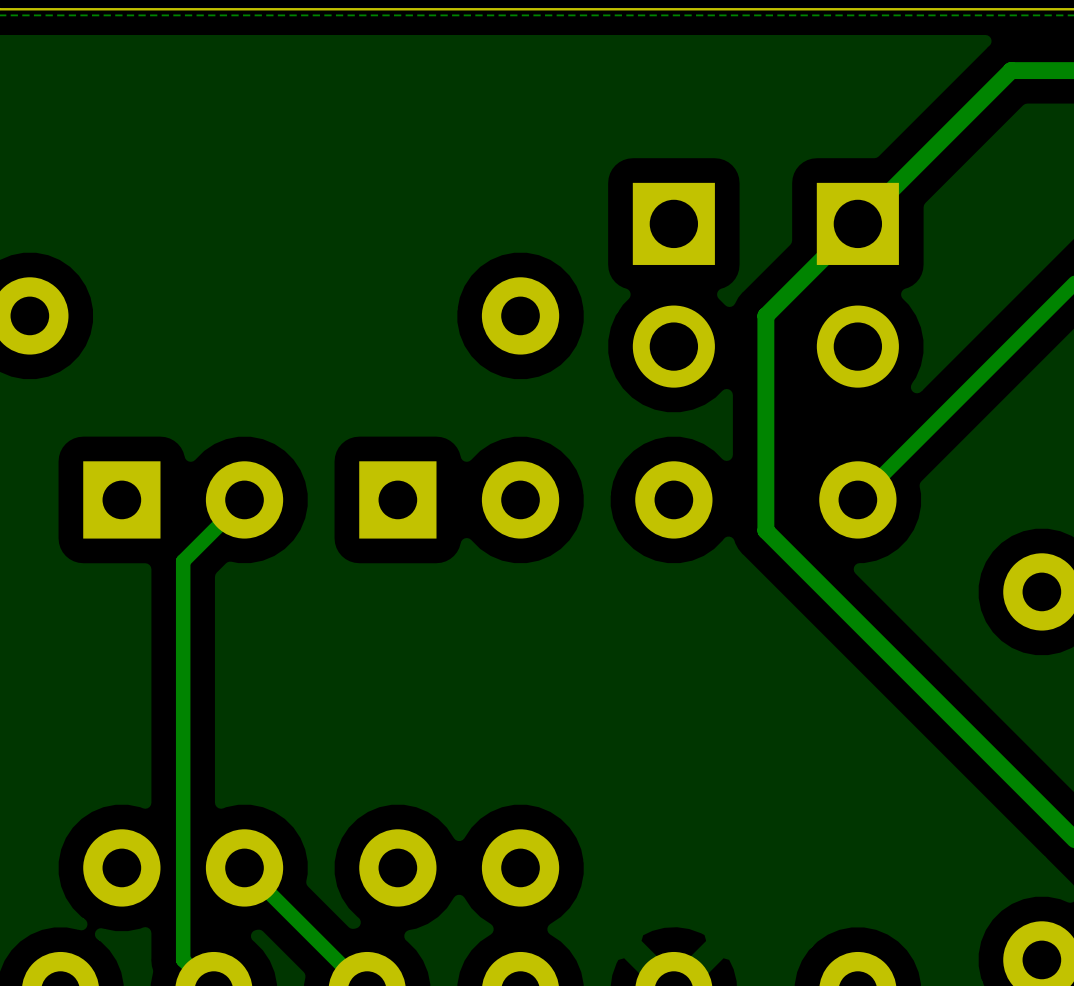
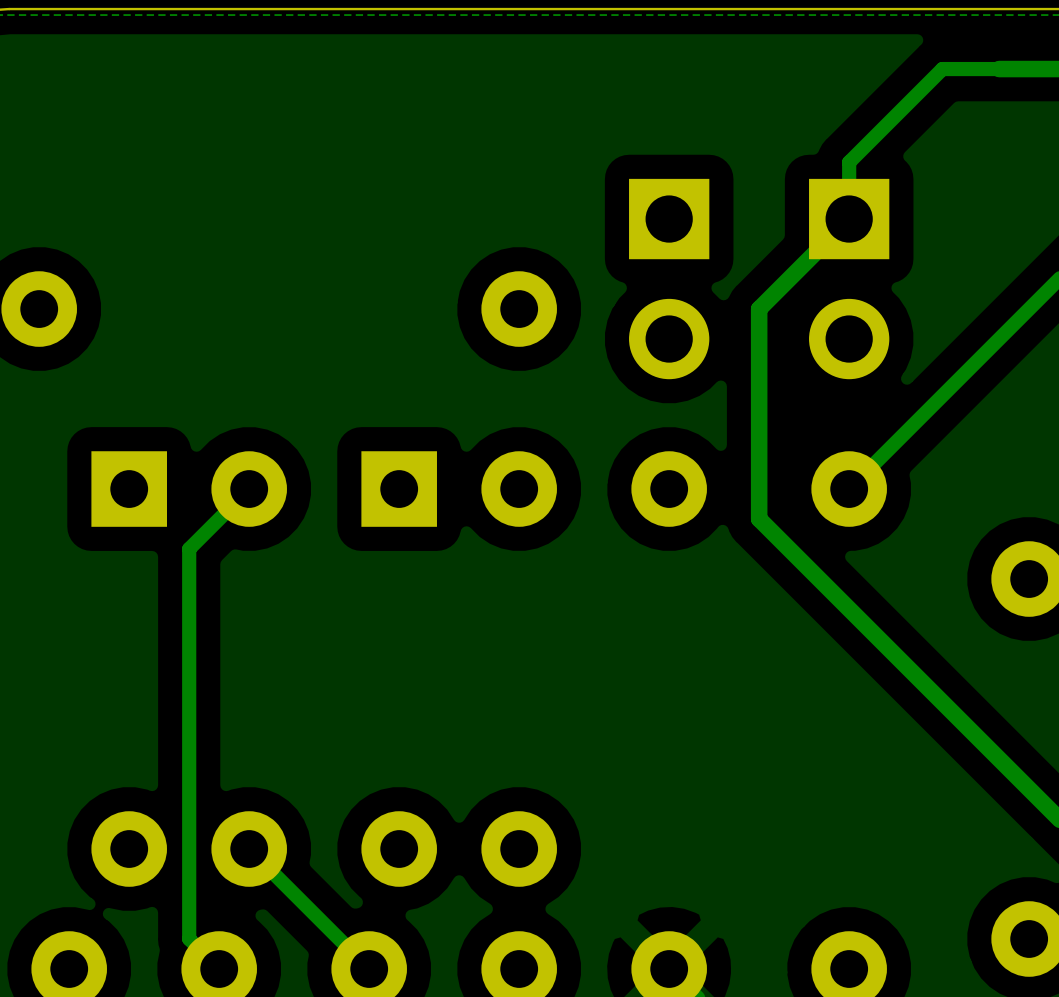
track: (1011, 70) (857, 223) -> (999, 69) (942, 69) (849, 162) (849, 219)

